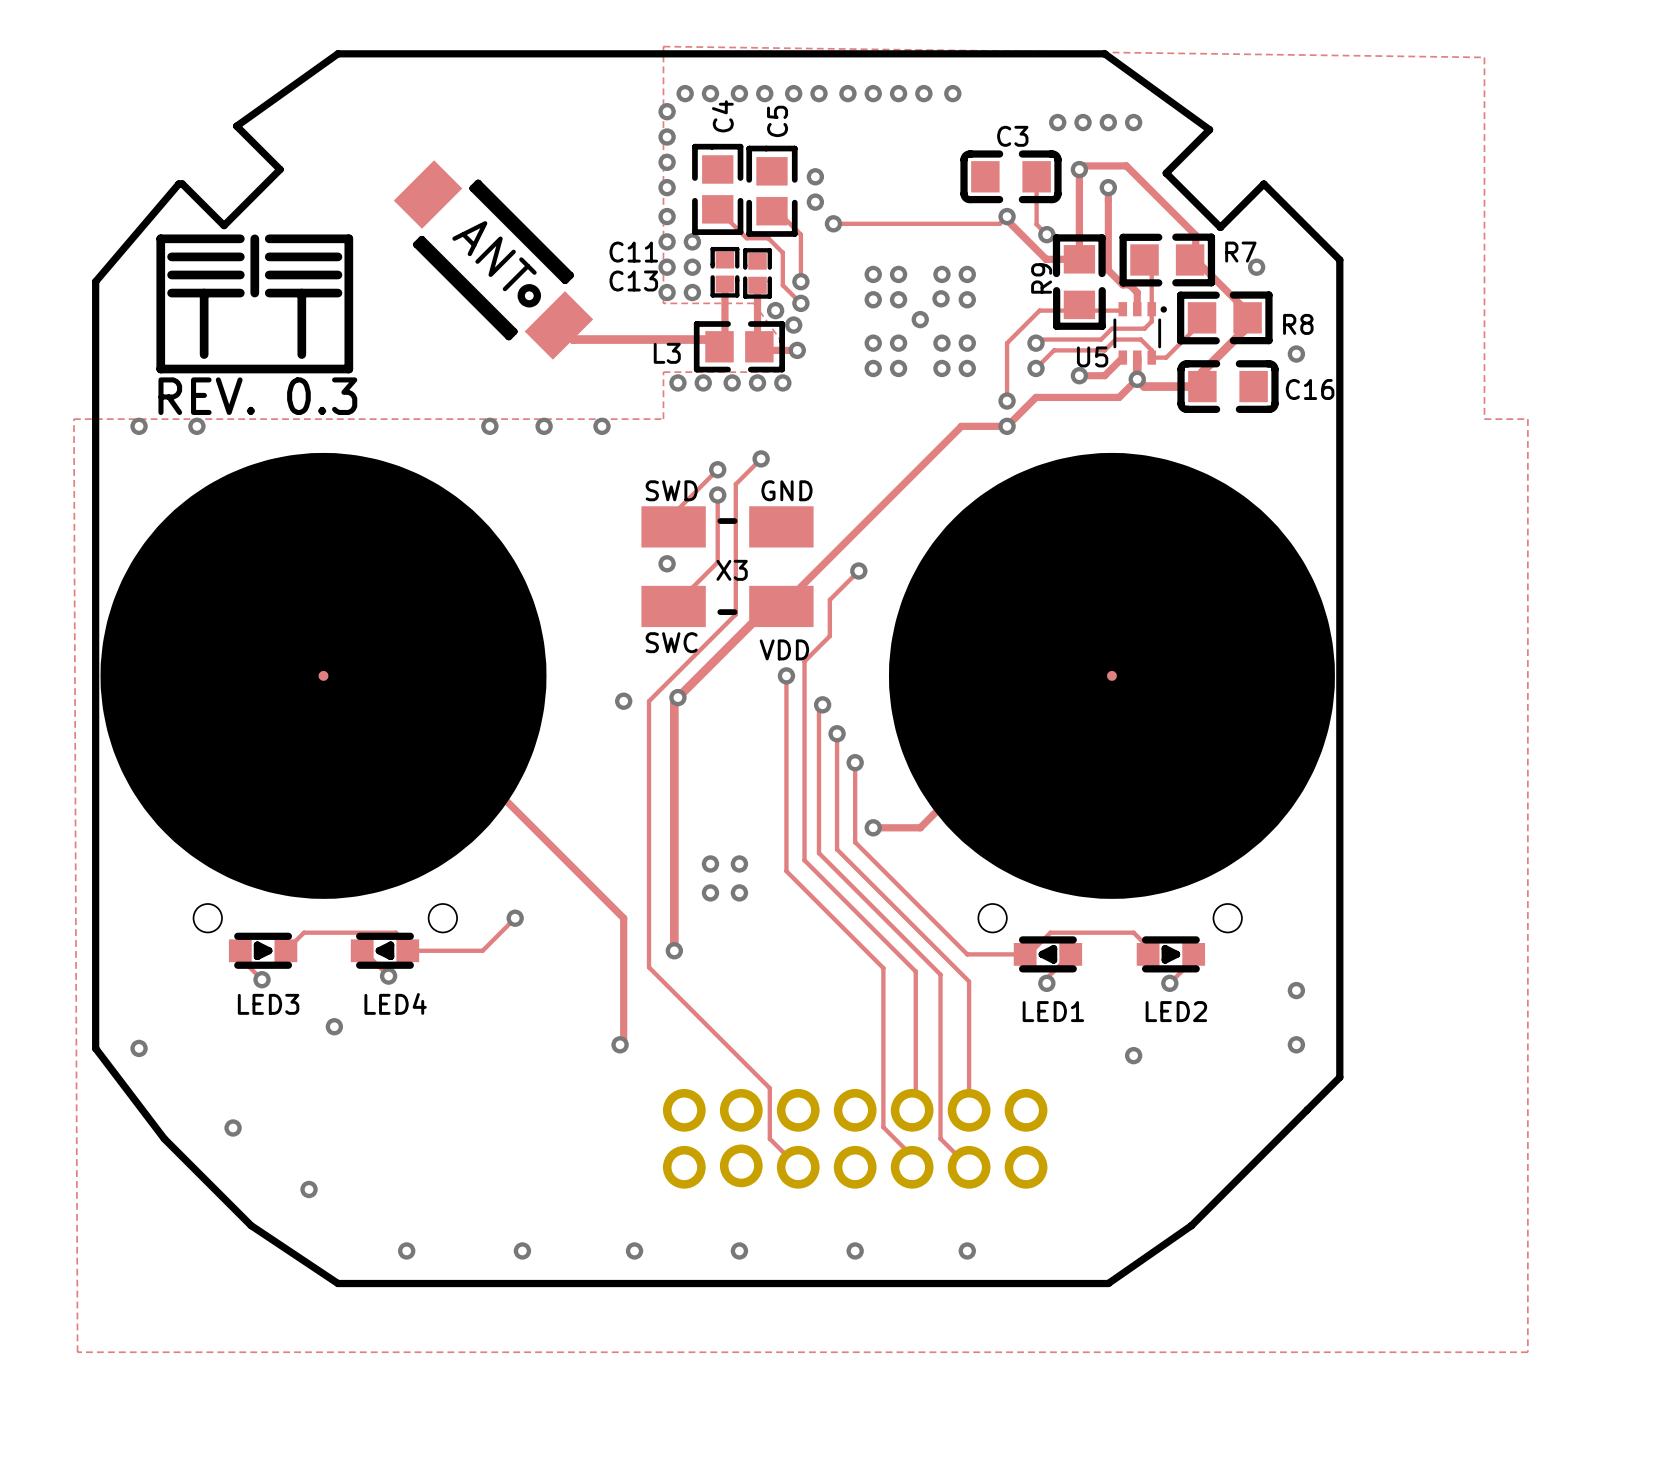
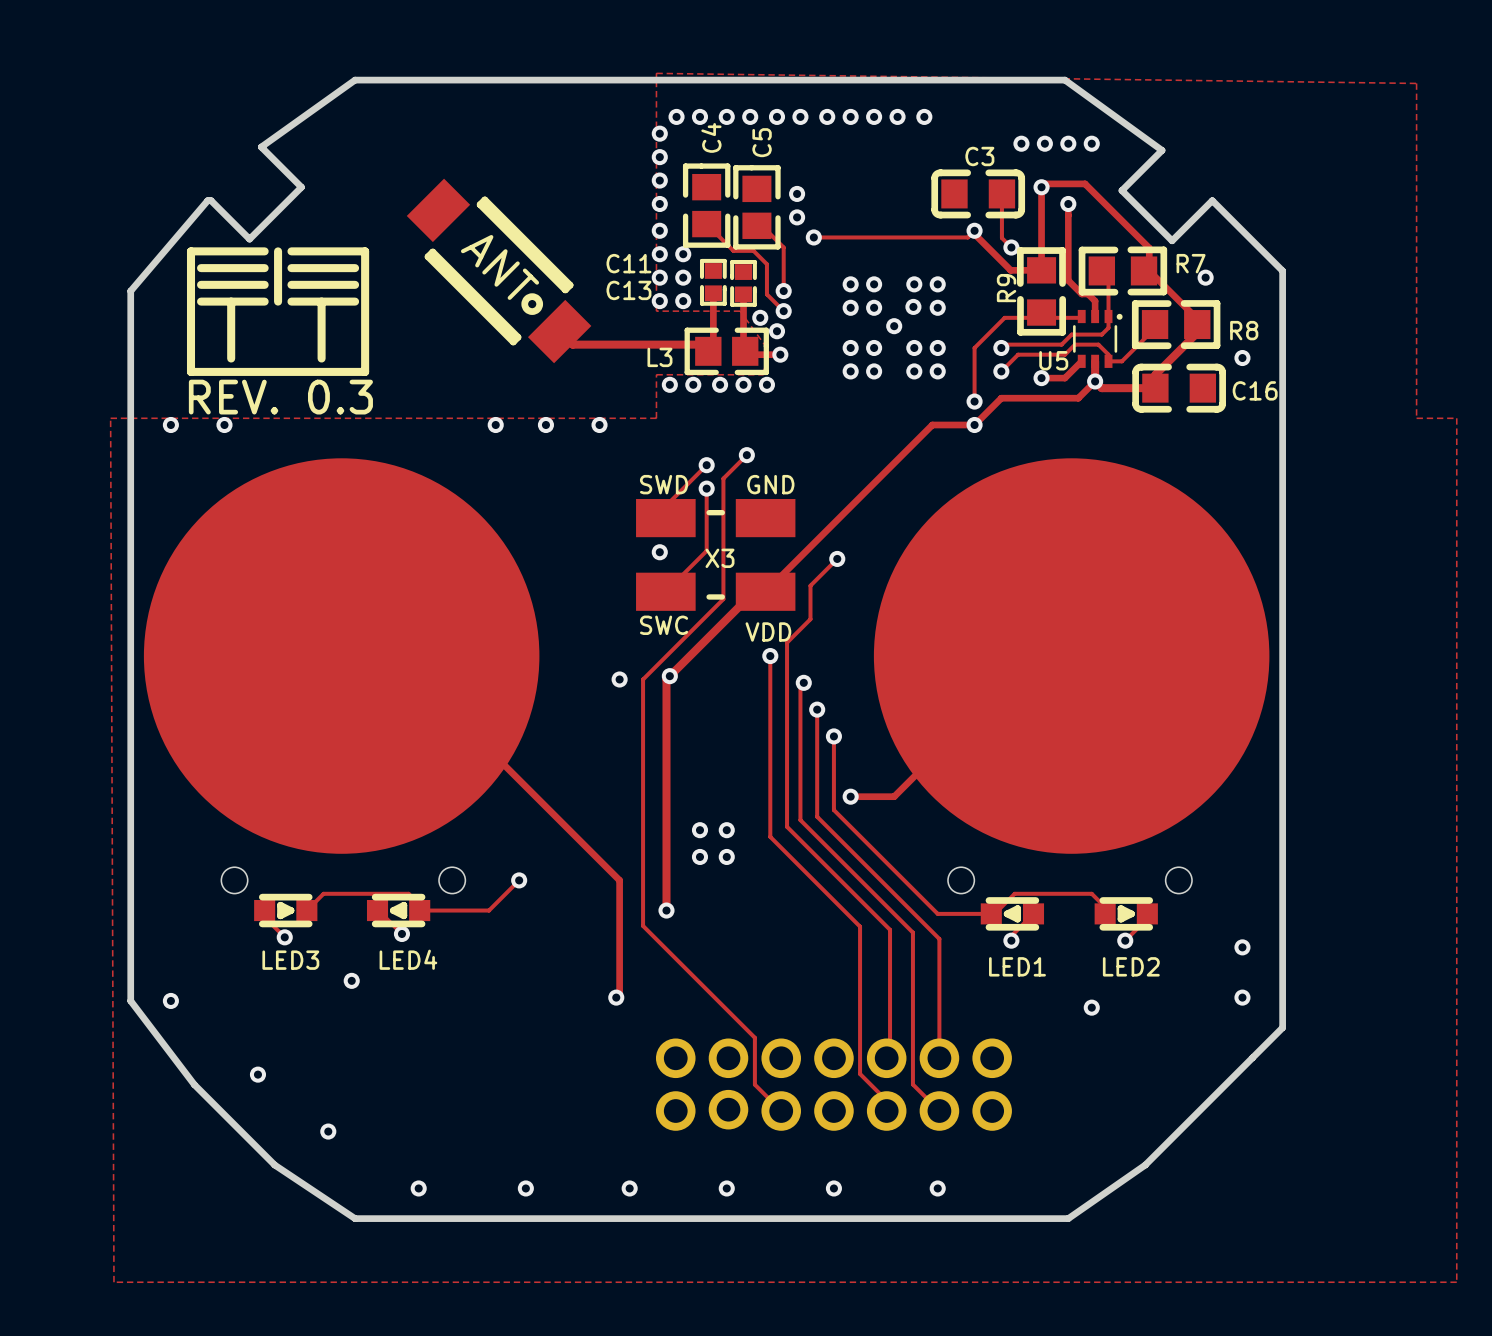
drawing: [100, 452, 547, 899] -> none
drawing: [888, 452, 1335, 899] -> none

